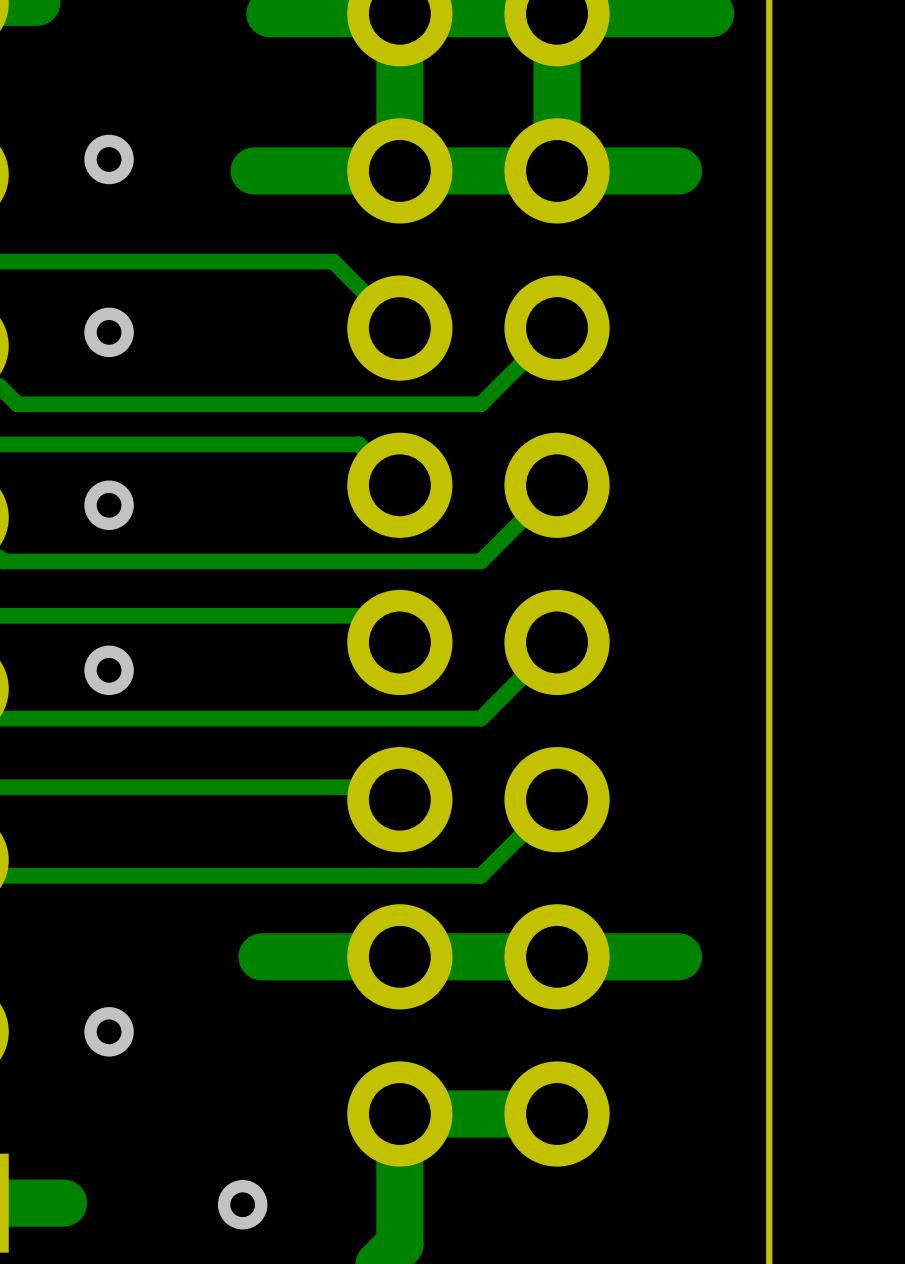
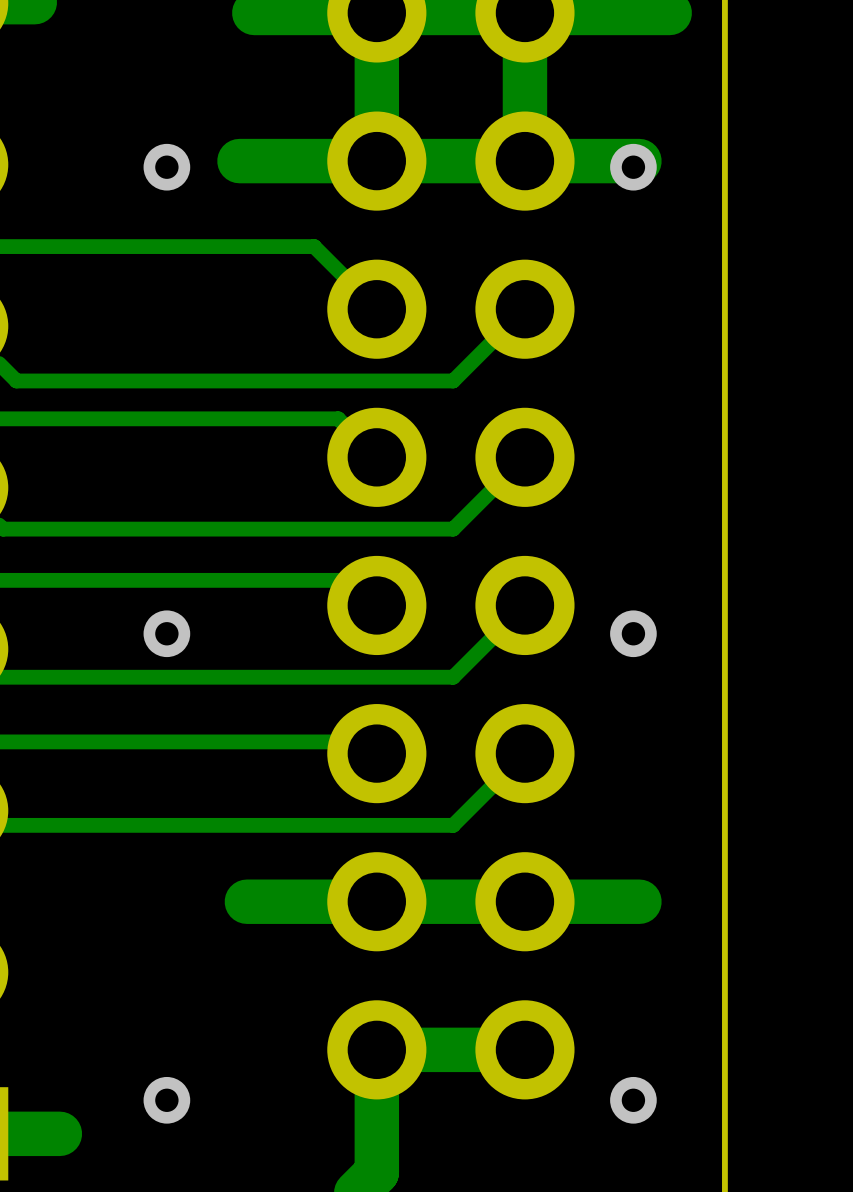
via position: (109, 159) -> (166, 167)
via: none -> (633, 167)
via: (109, 332) -> none
via: (109, 505) -> none
via position: (109, 670) -> (166, 633)
via: none -> (633, 633)
via: (109, 1031) -> none
via: none -> (166, 1100)
via: none -> (633, 1100)
via: (242, 1204) -> none

